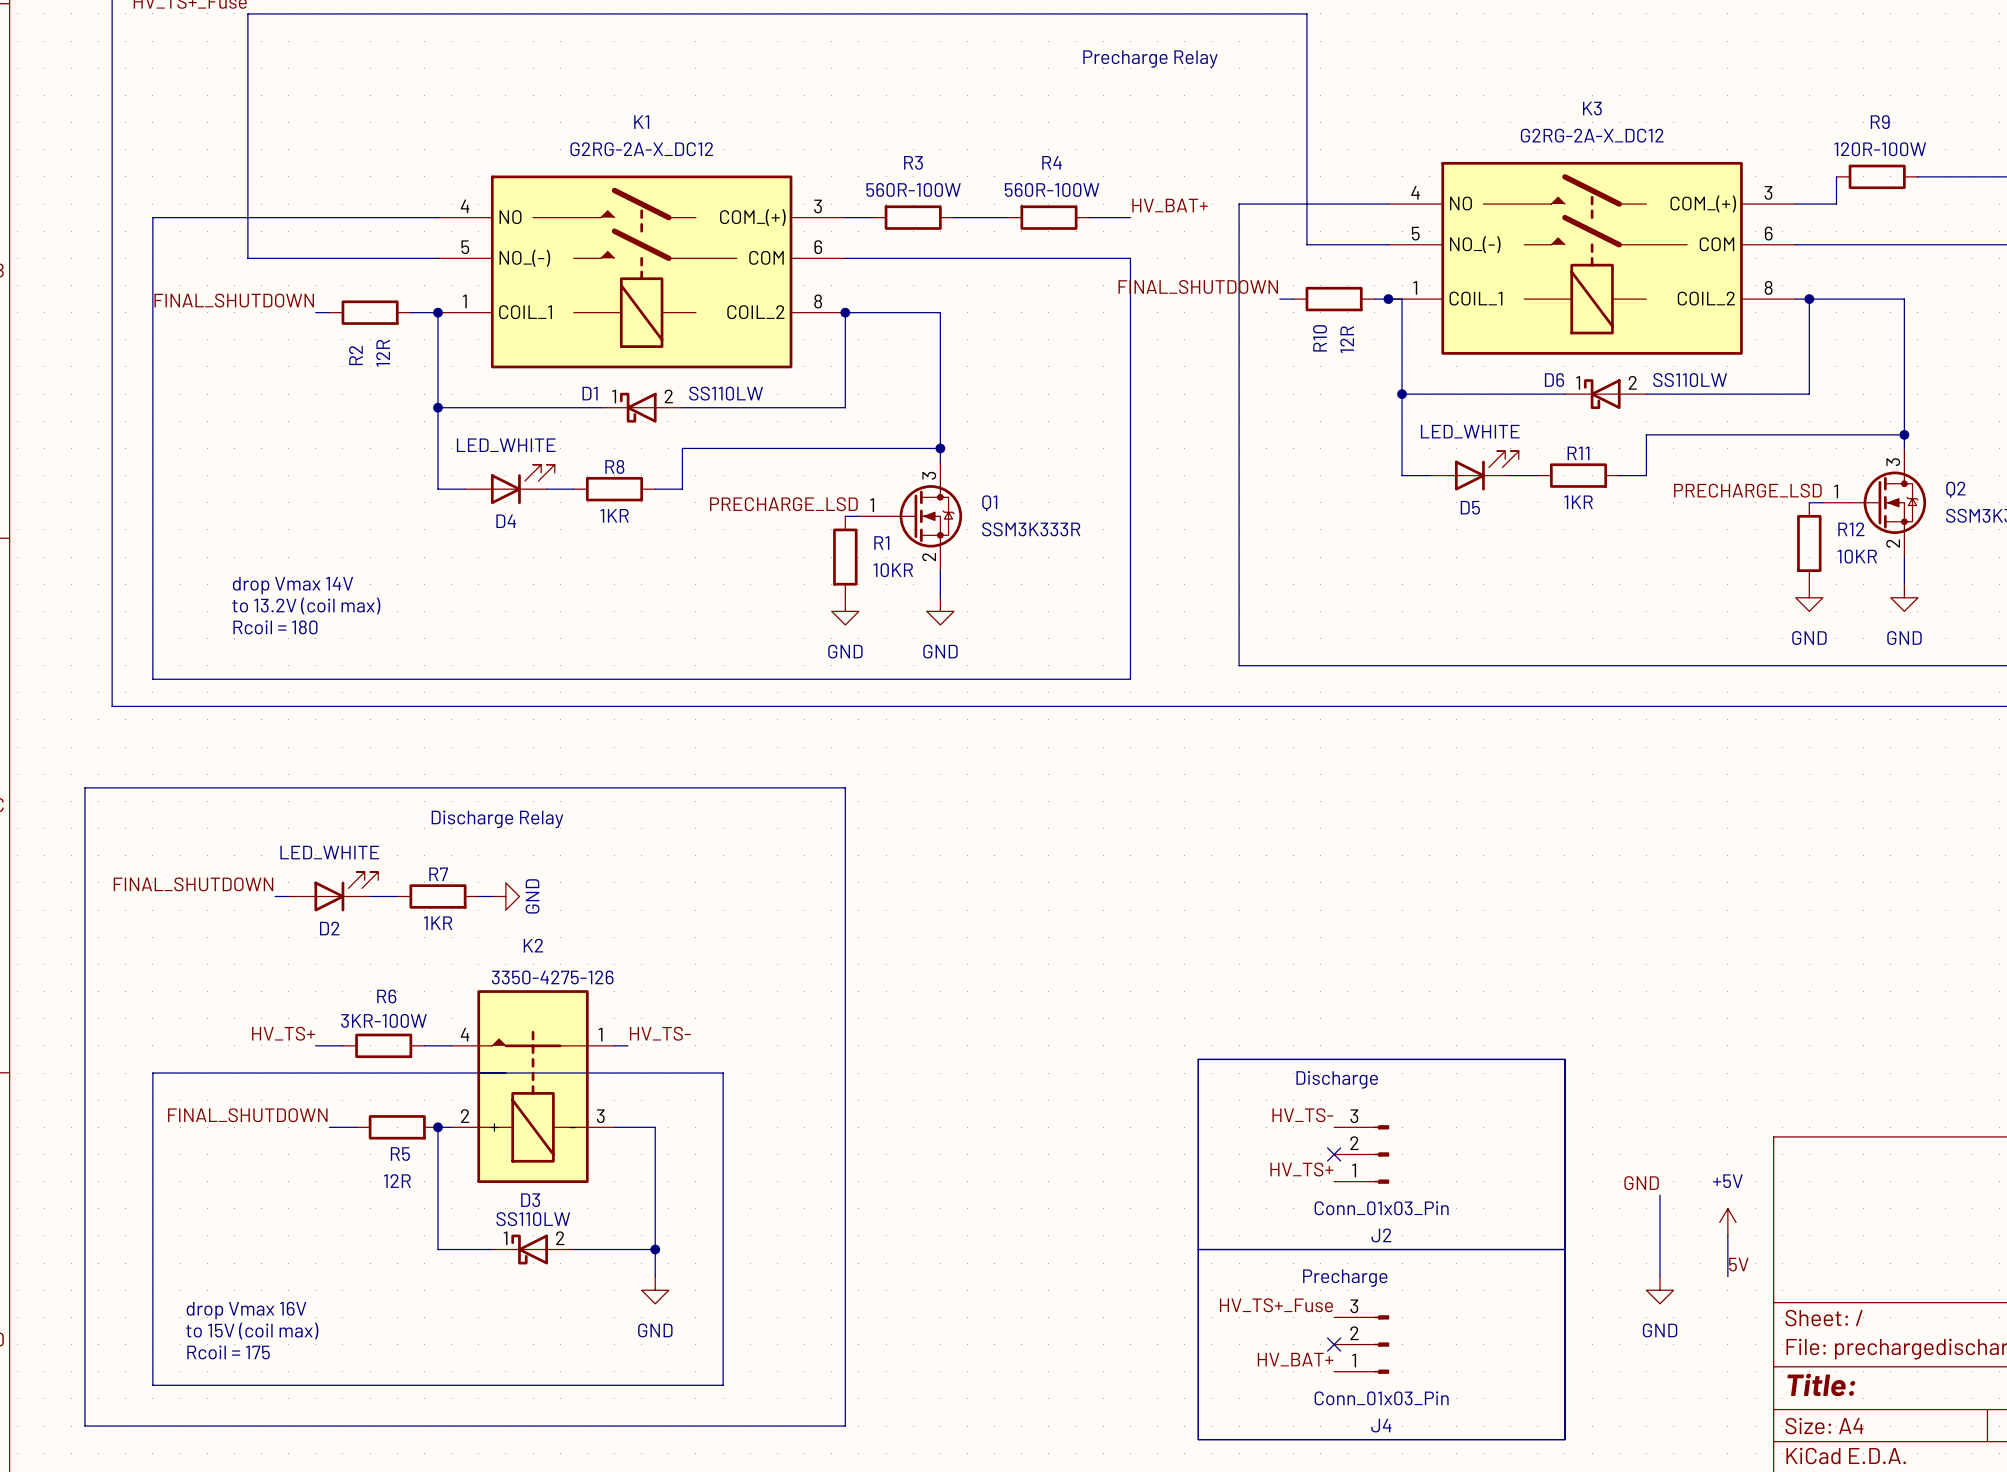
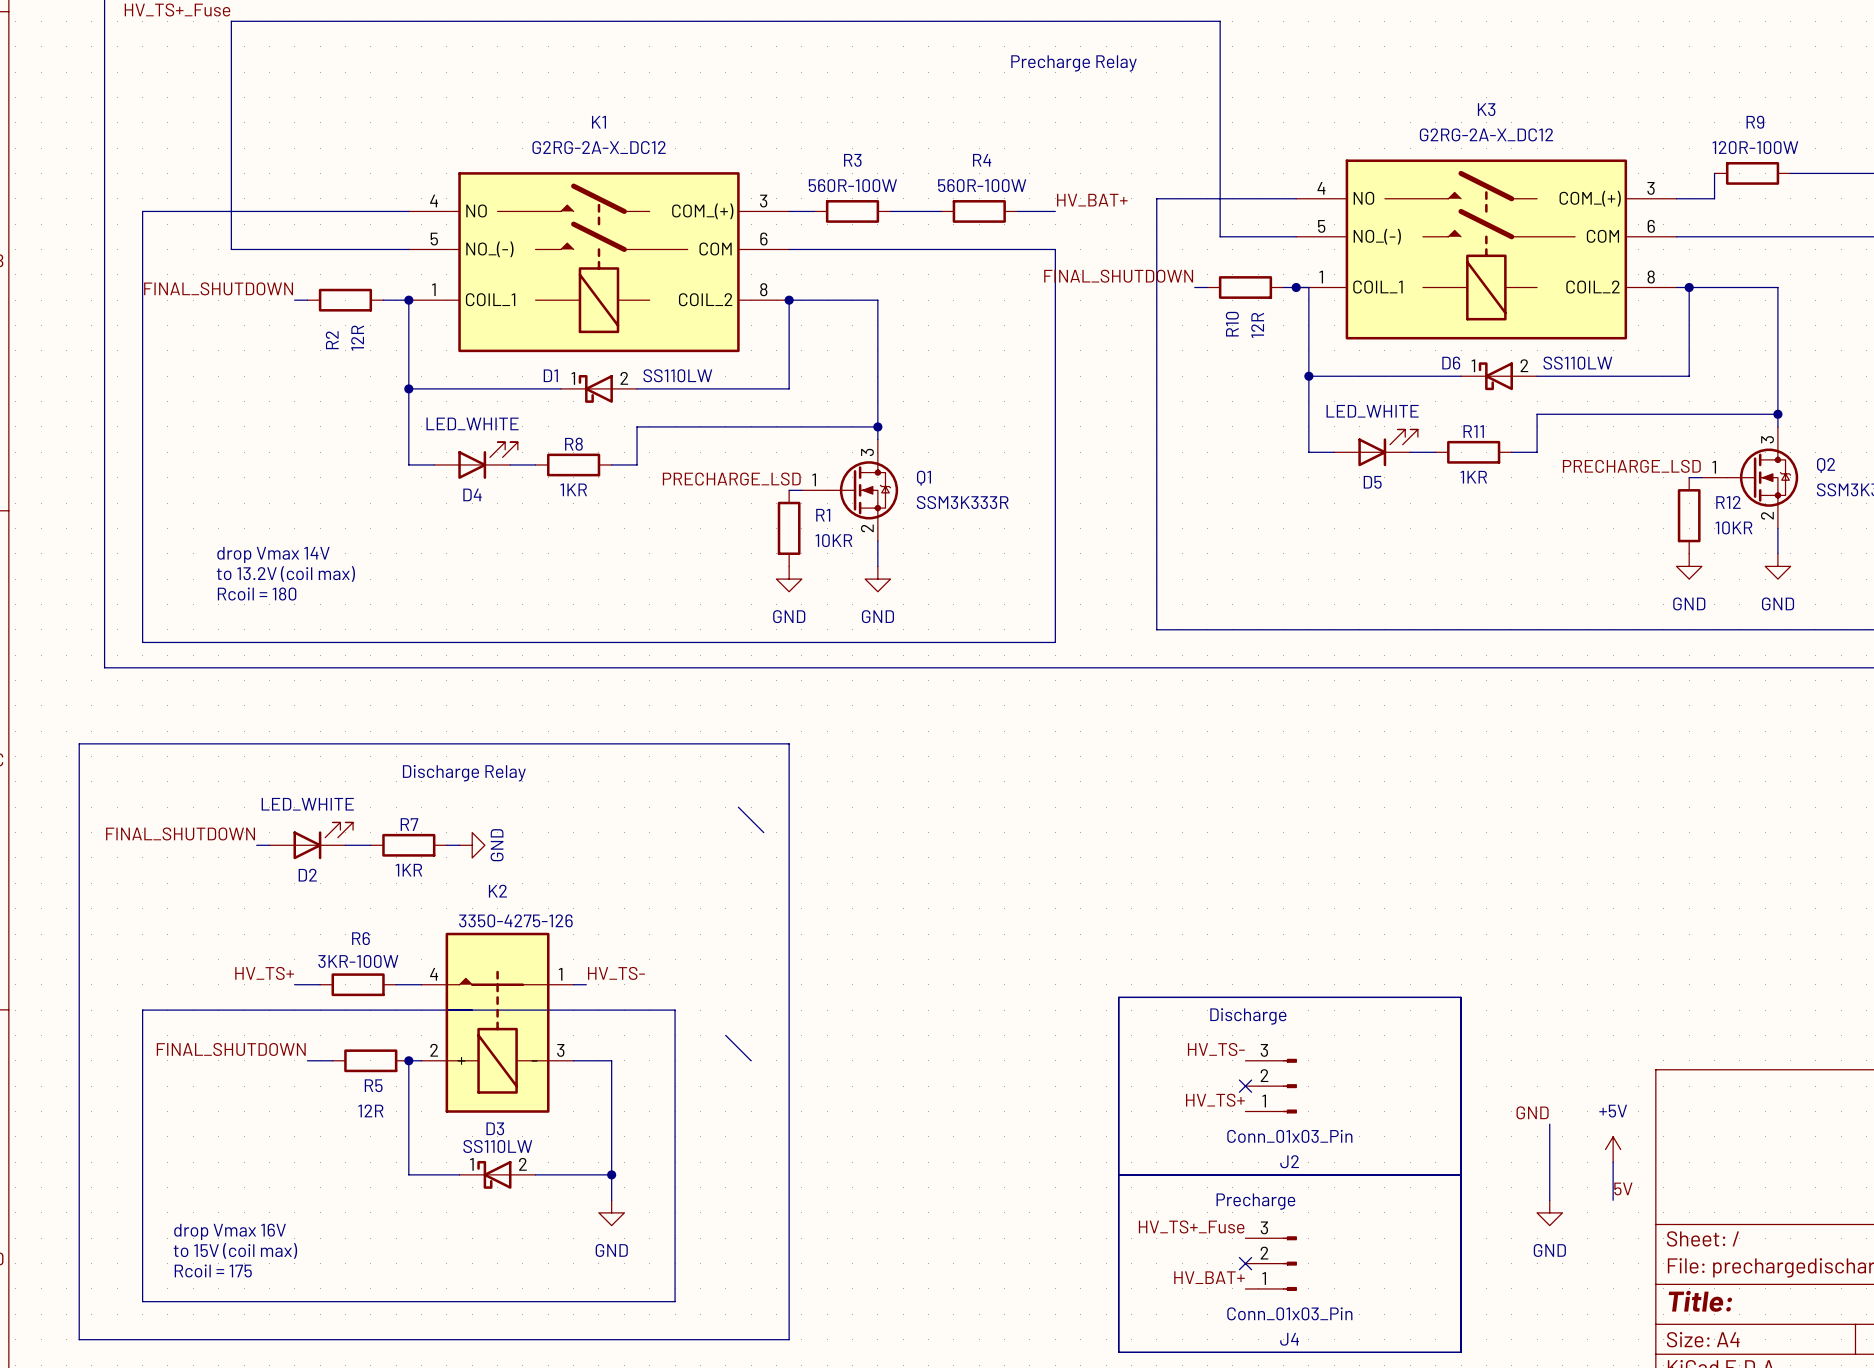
wire: none -> (738, 807) (763, 832)
wire: none -> (725, 1035) (751, 1060)

